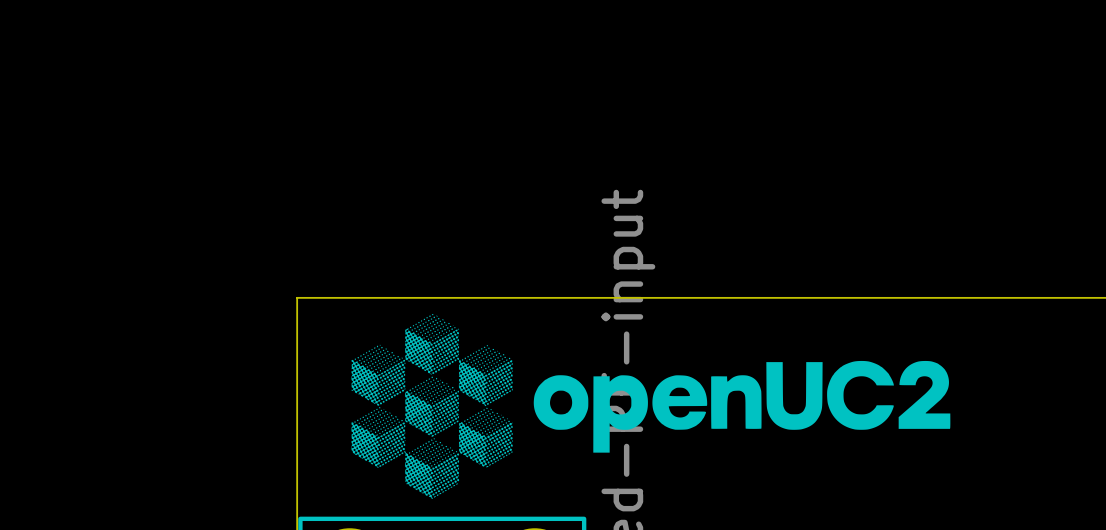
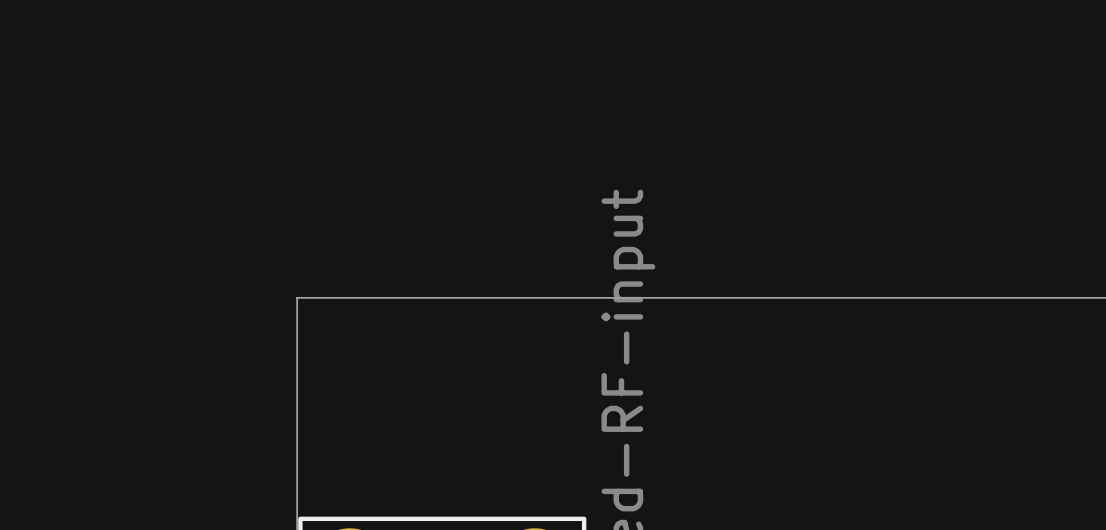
drawing: [351, 314, 951, 499] -> none

